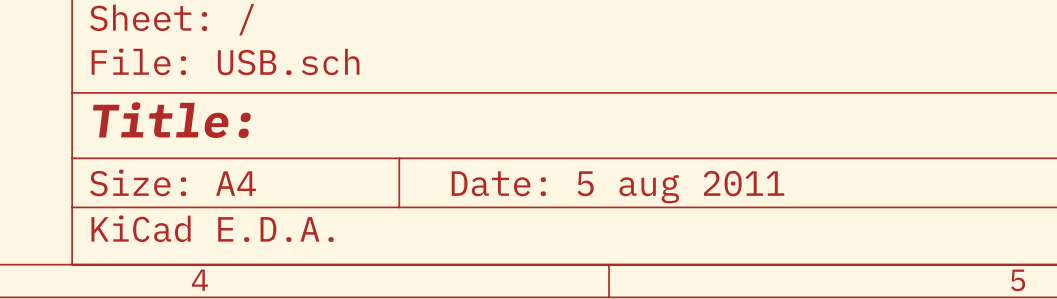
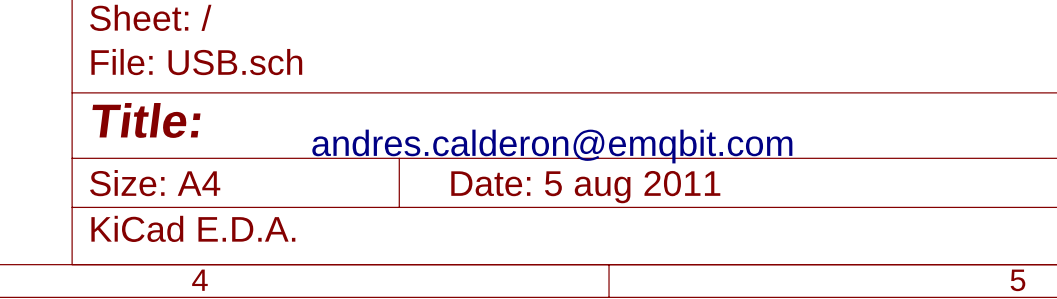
text: none -> andres.calderon@emqbit.com (552, 146)

